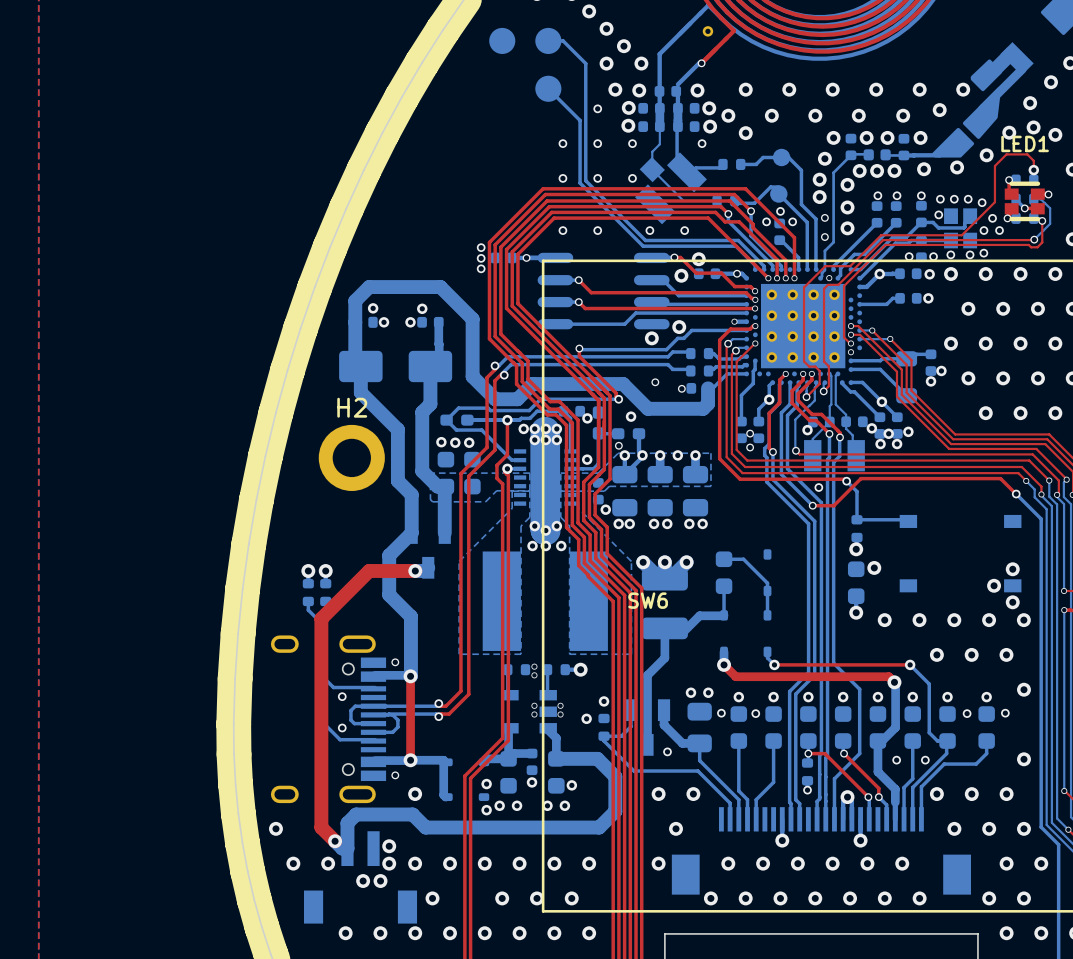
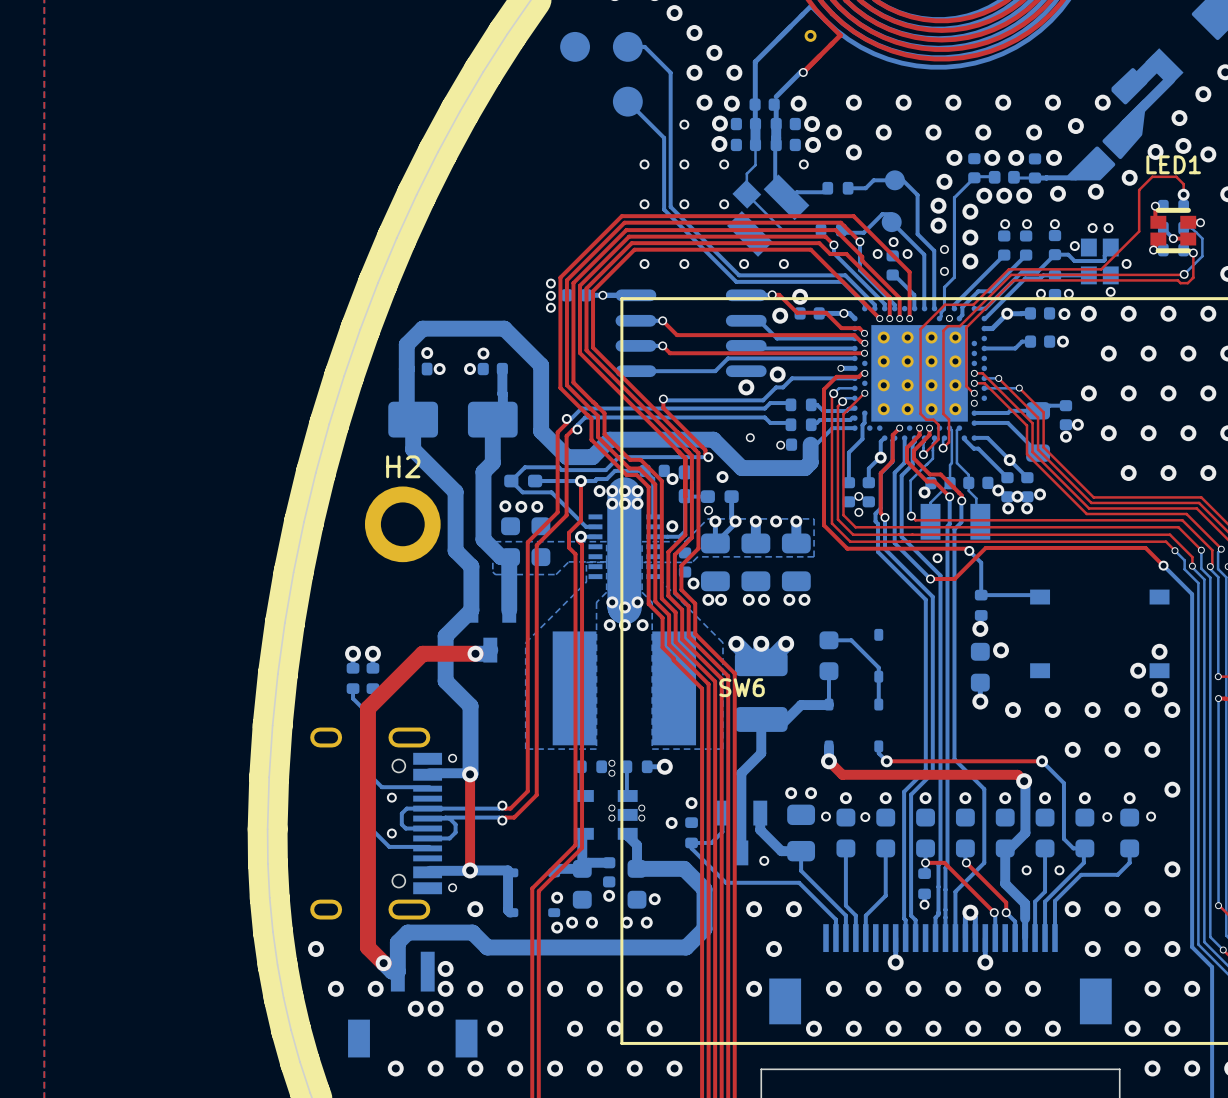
via: (940, 199) -> none
via: (982, 202) -> none
via: (992, 218) -> none
via: (999, 230) -> none
via: (983, 253) -> none
via: (950, 254) -> none

